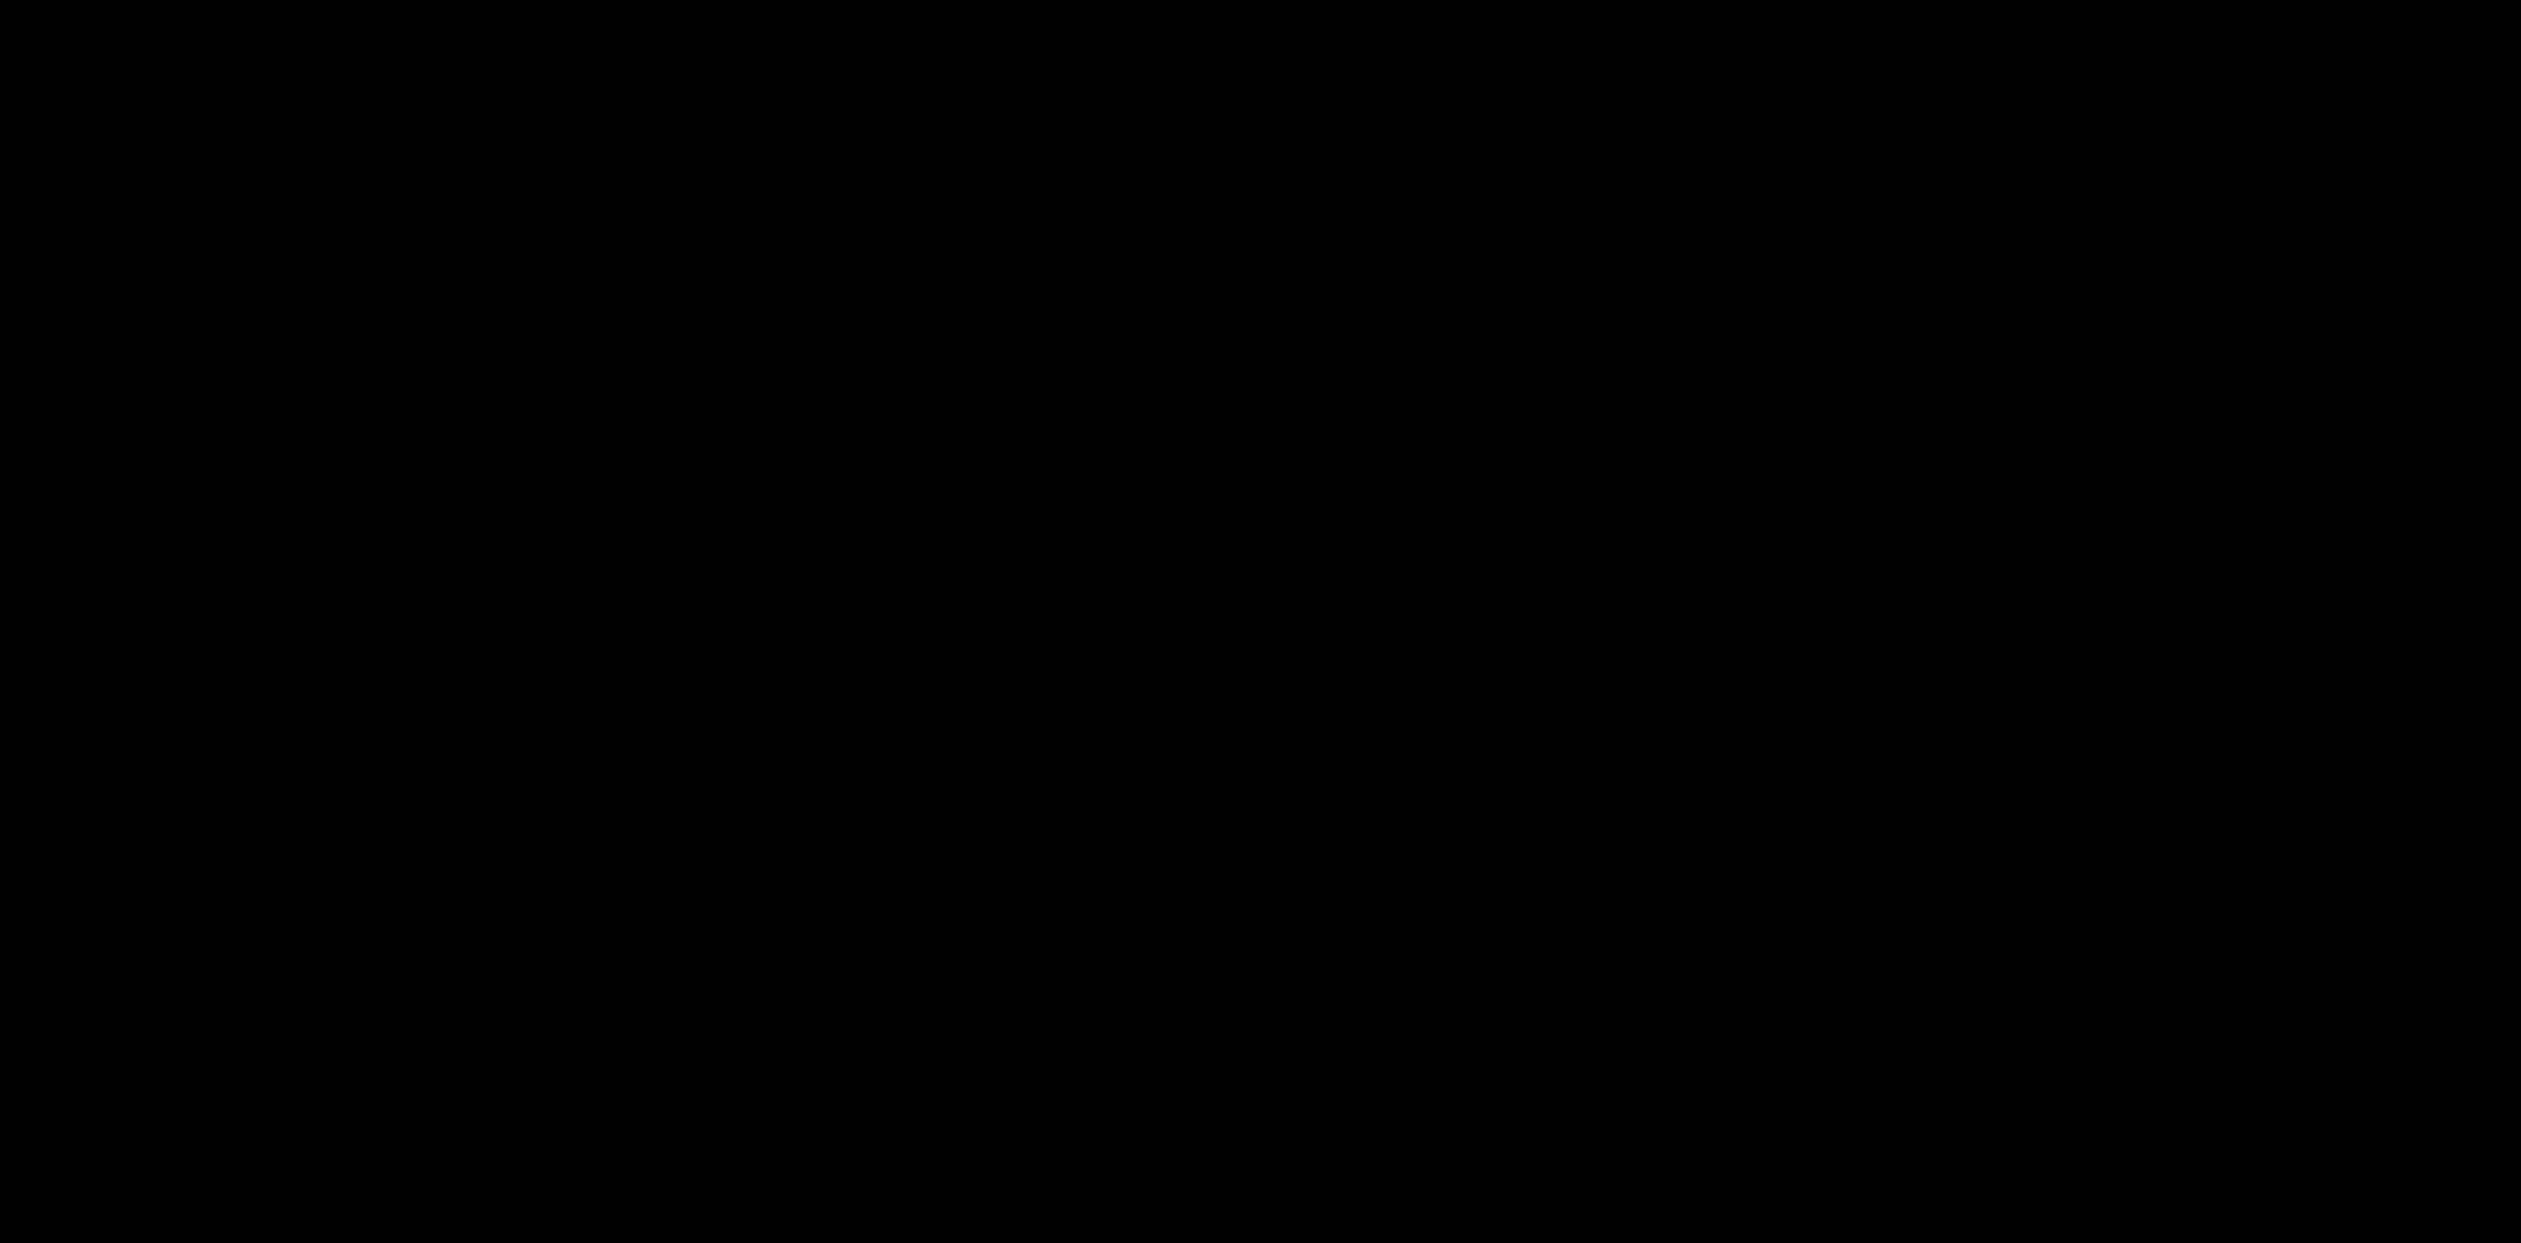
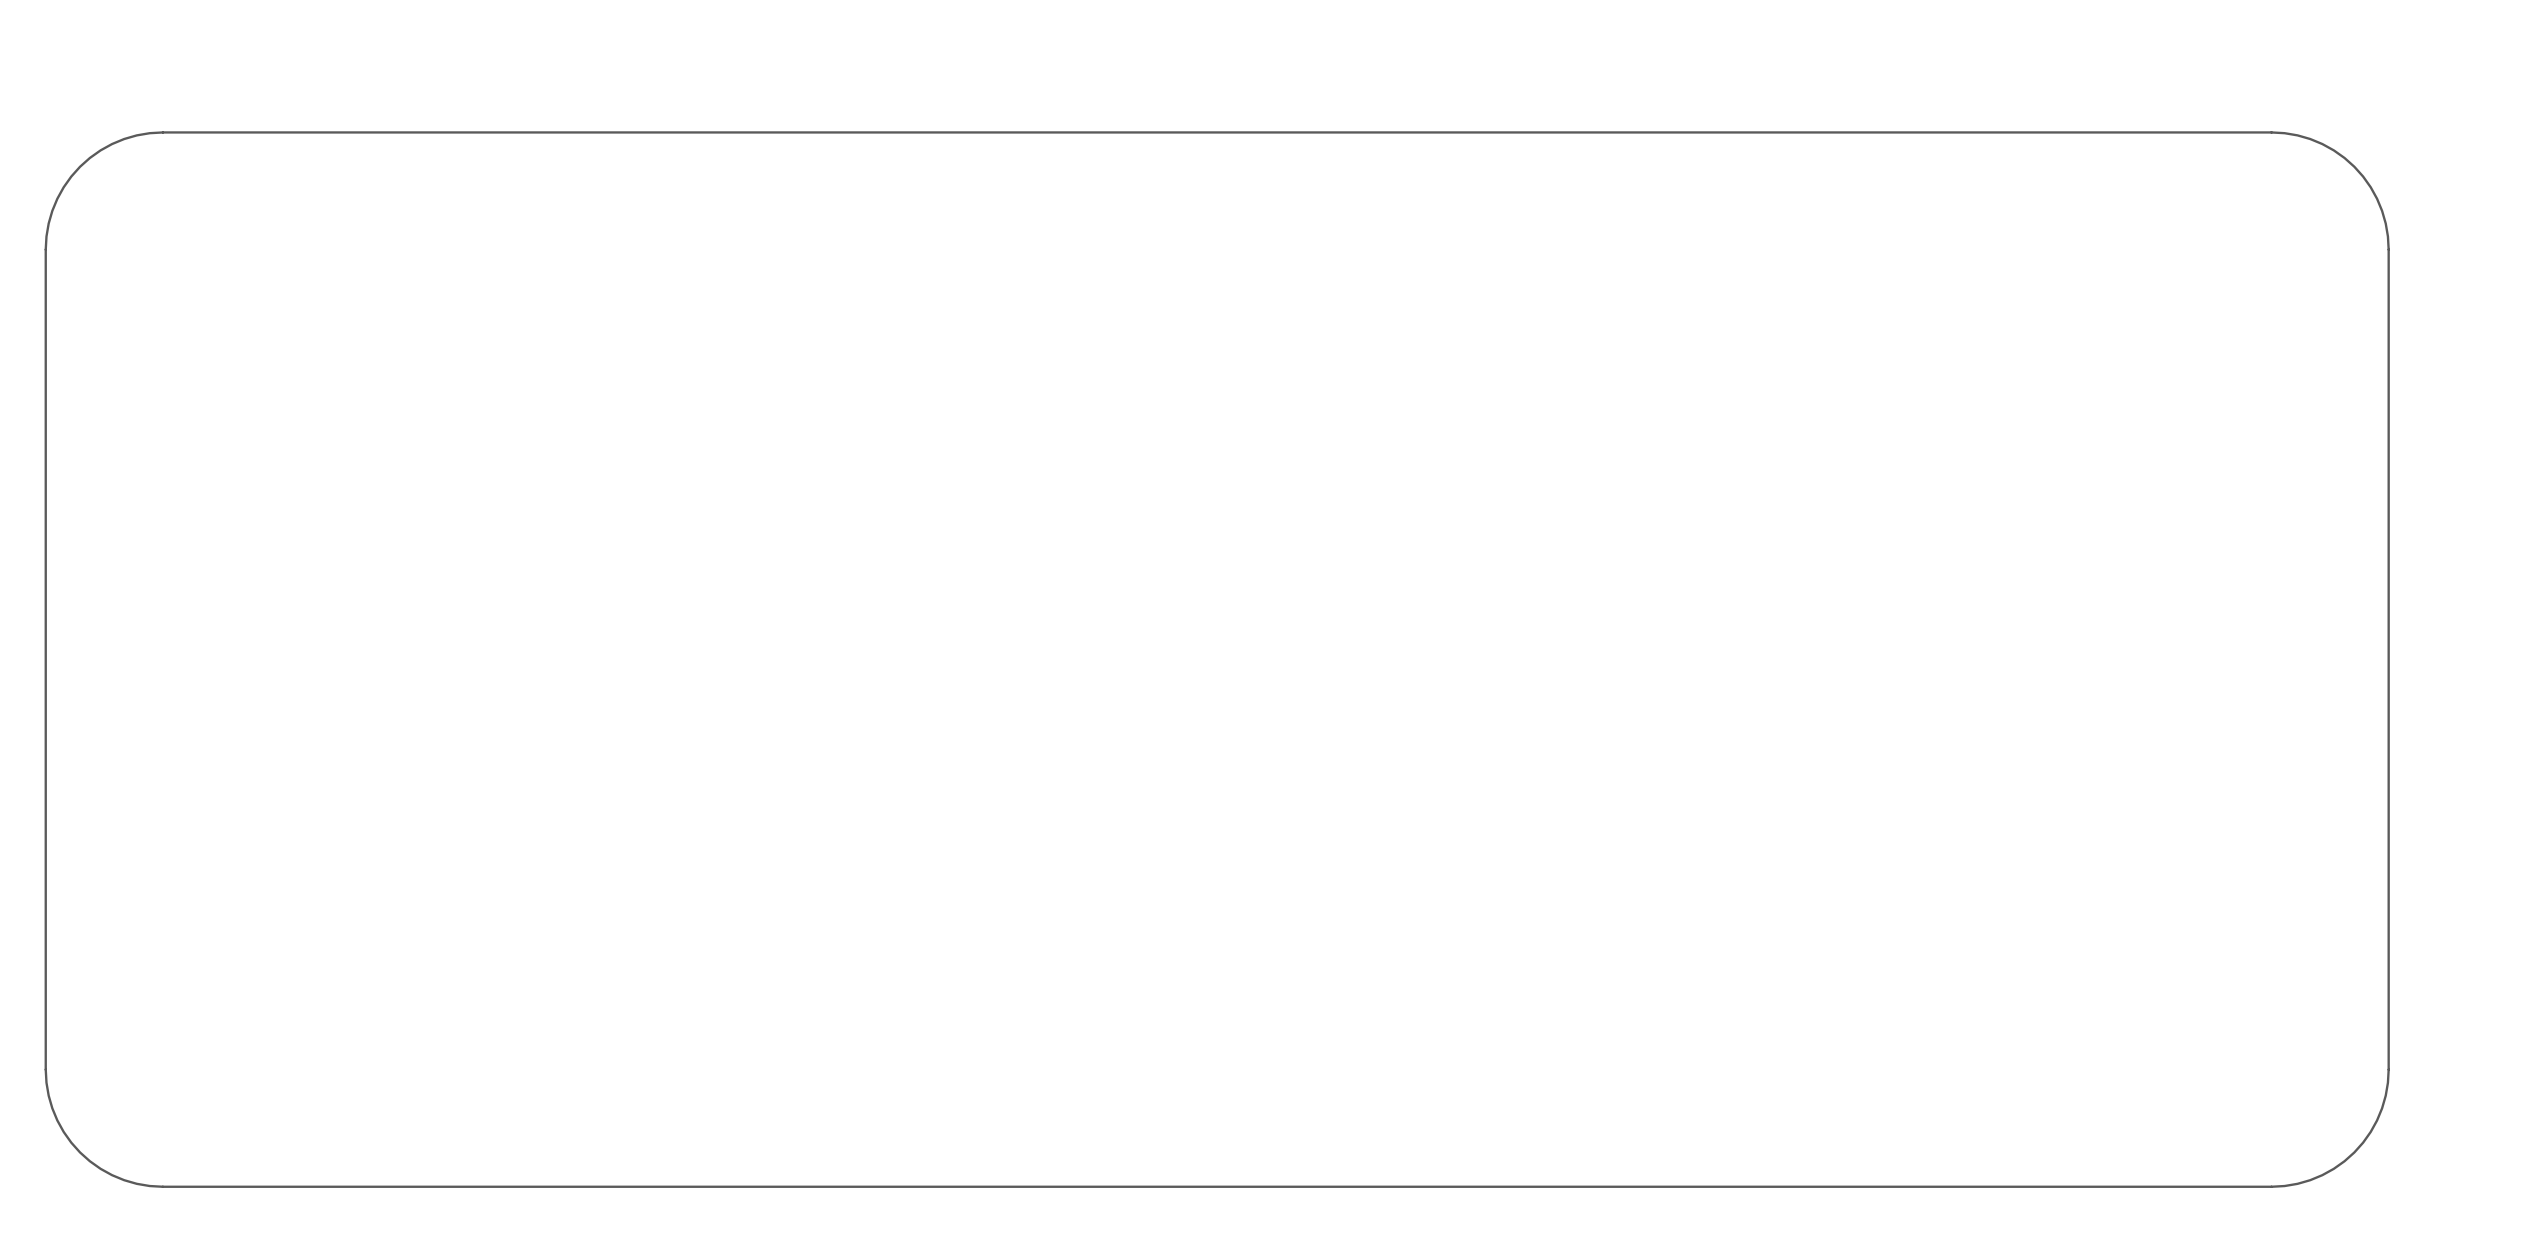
line: none -> (162, 132) (2271, 132) (2297, 135) (2322, 144) (2344, 158) (2370, 187) (2385, 223) (2388, 249) (2388, 1069) (2385, 1095) (2377, 1120) (2363, 1142) (2333, 1168) (2297, 1183) (2271, 1186) (162, 1186) (136, 1183) (112, 1175) (89, 1161) (71, 1142) (52, 1108) (46, 1082) (45, 249) (52, 210) (63, 187) (80, 166) (112, 144) (136, 135) (162, 132)

